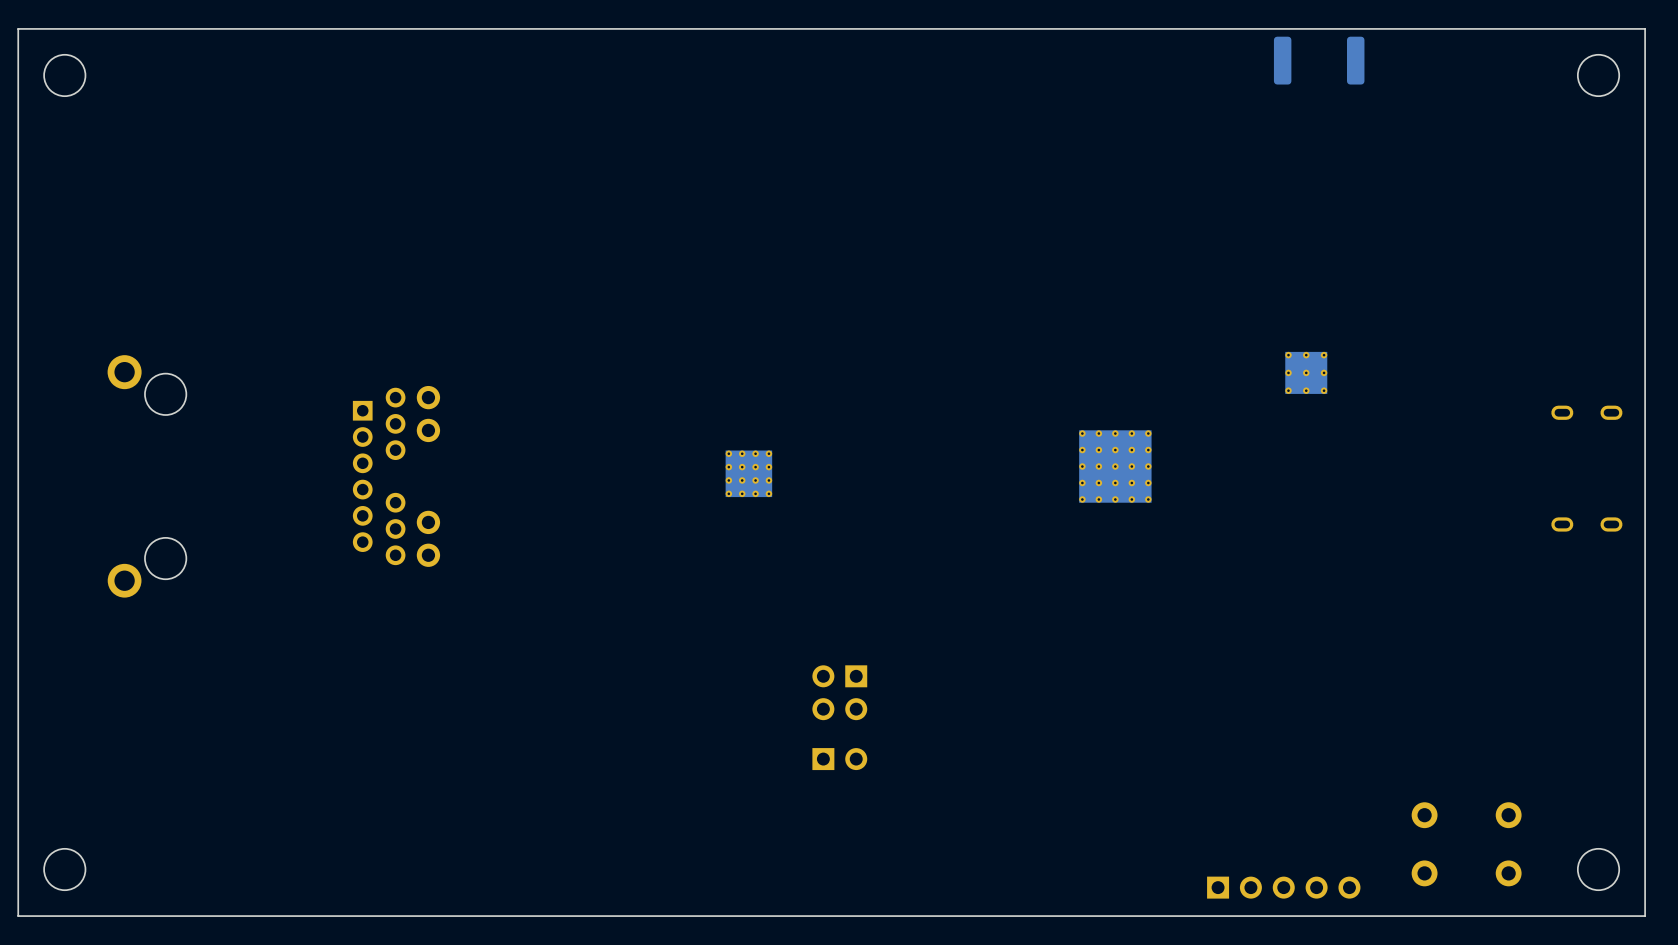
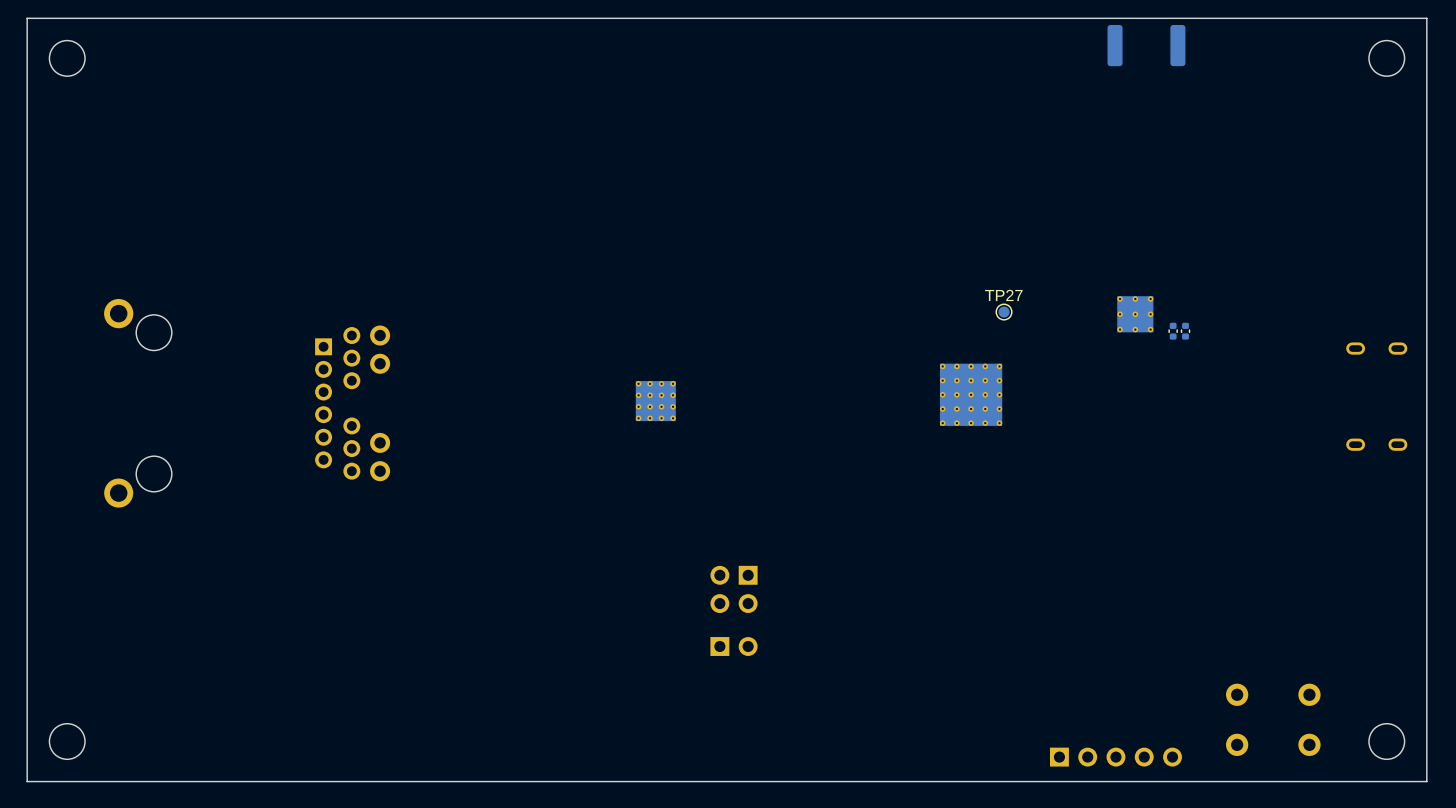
TP27: none -> (1004, 312)
part: none -> (1173, 331)
part: none -> (1185, 331)

